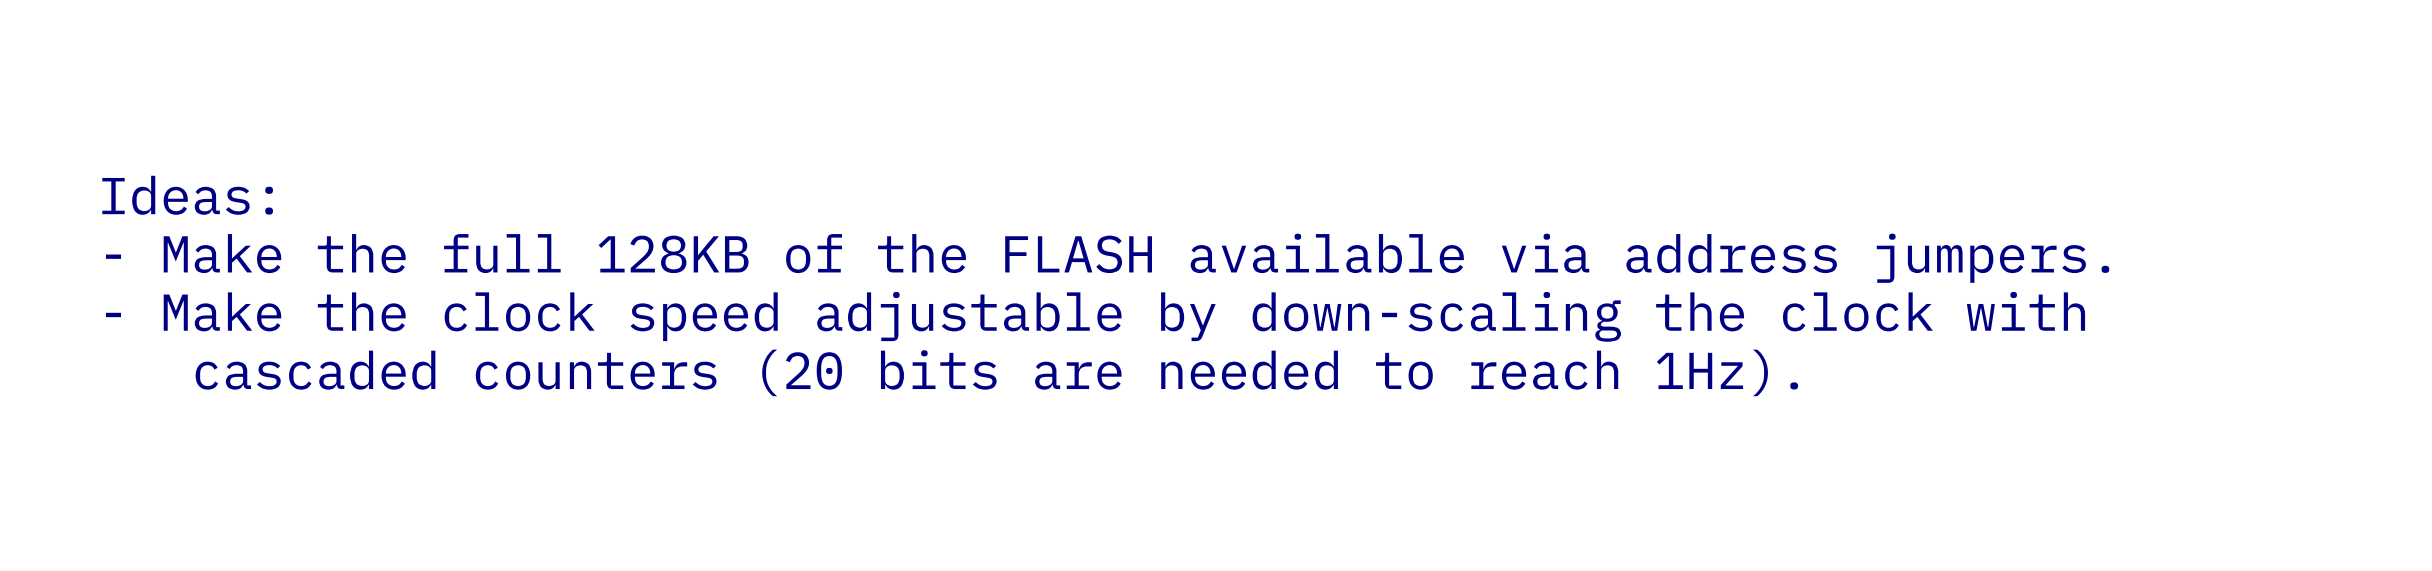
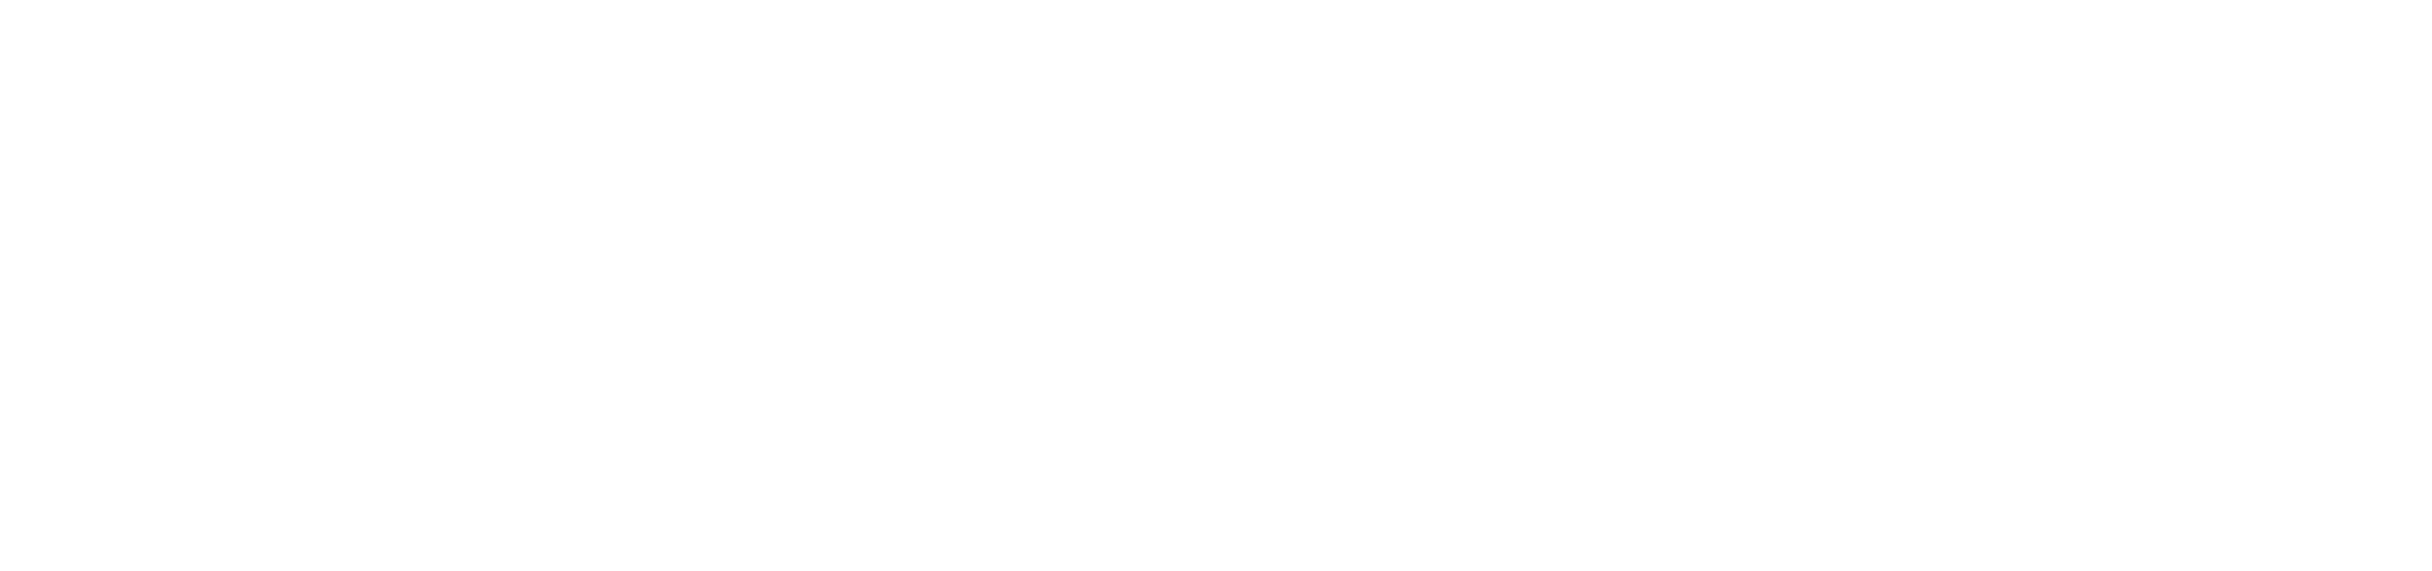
text: Ideas: (187, 195) -> none
text: - Make the full 128KB of the FLASH available via address jumpers. (1107, 258) -> none
text: - Make the clock speed adjustable by down-scaling the clock with (1095, 316) -> none
text: cascaded counters (20 bits are needed to reach 1Hz). (996, 372) -> none

